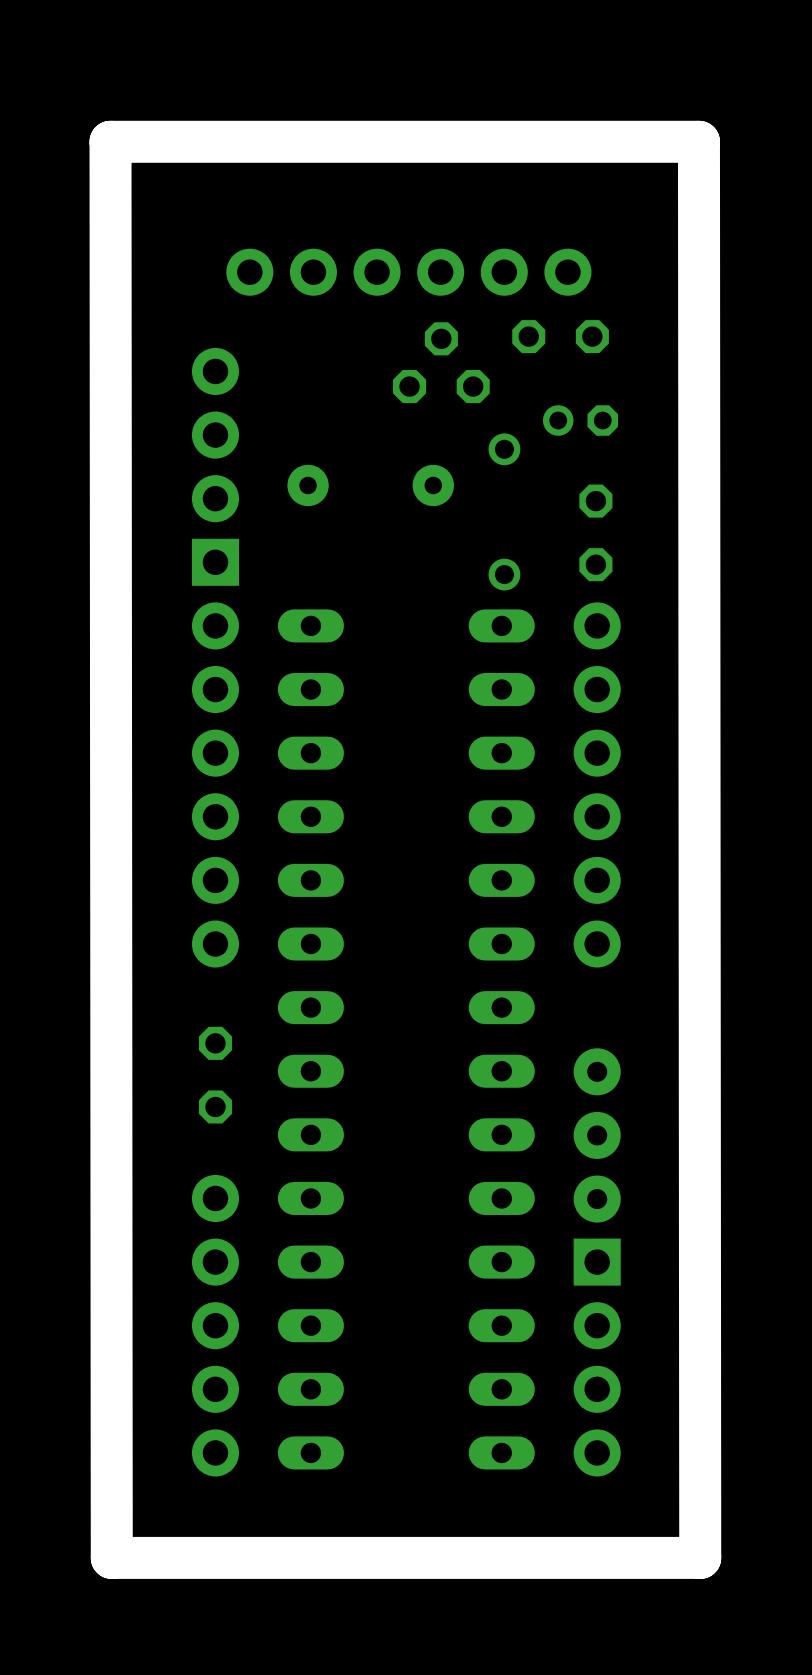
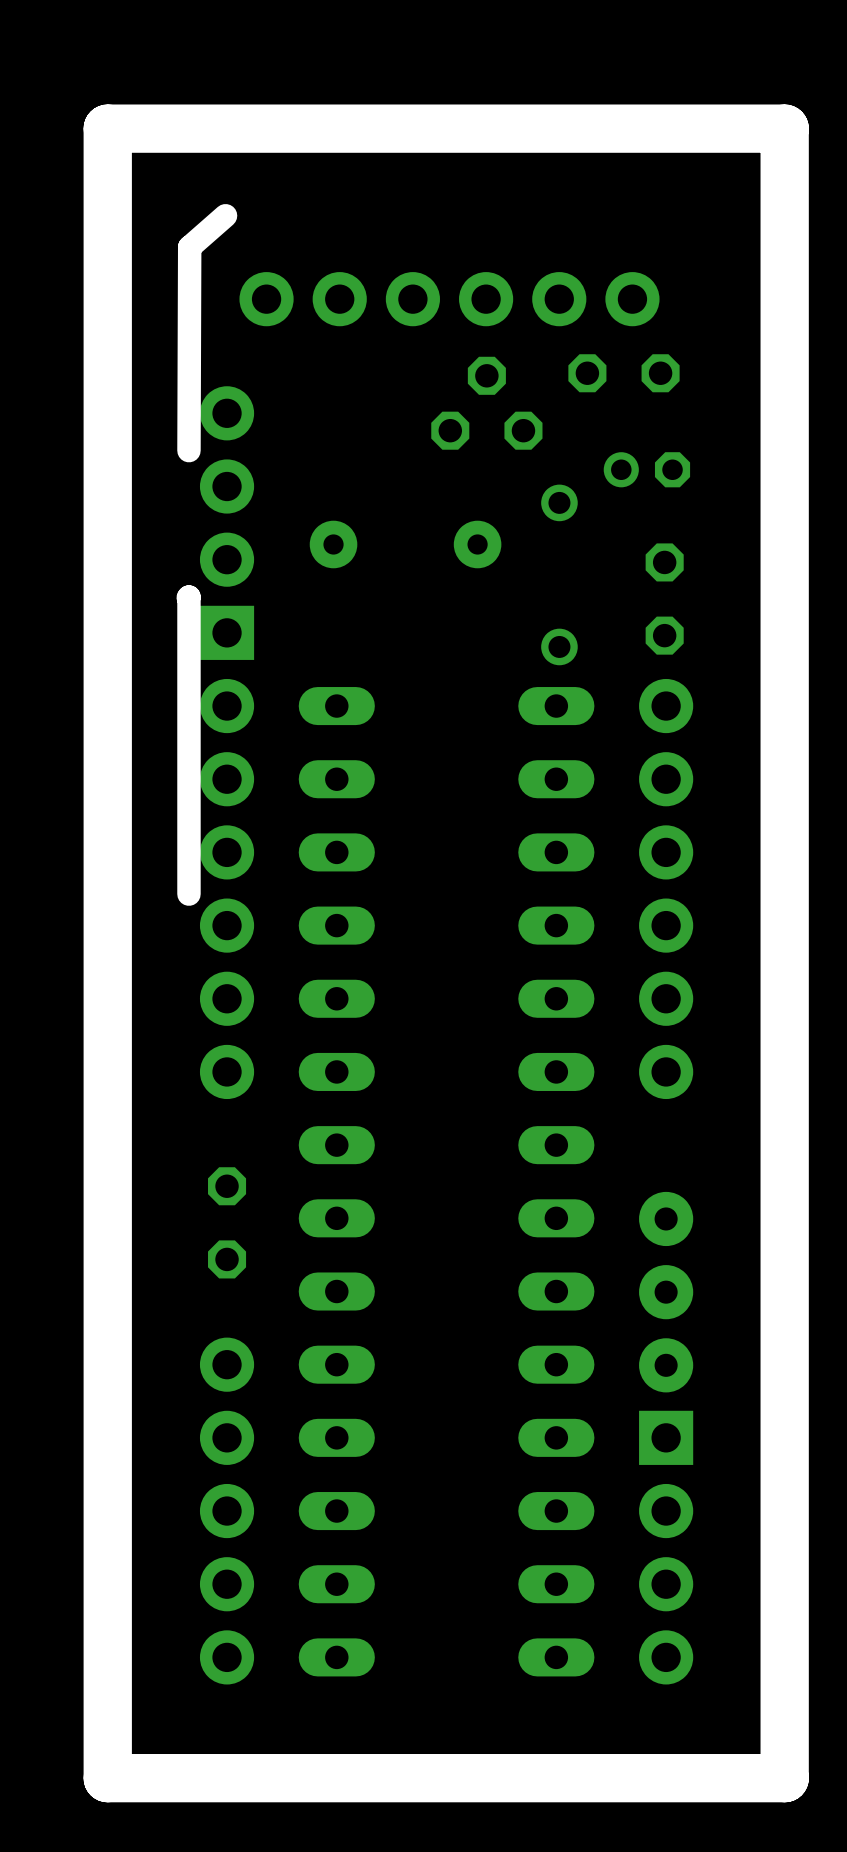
board edge: none -> (225, 215) (189, 247) (188, 450)
board edge: none -> (188, 597) (188, 894)
board edge: (700, 1557) (698, 141) (110, 141) (111, 1557) -> (784, 1778) (784, 128) (107, 128) (107, 1778)

